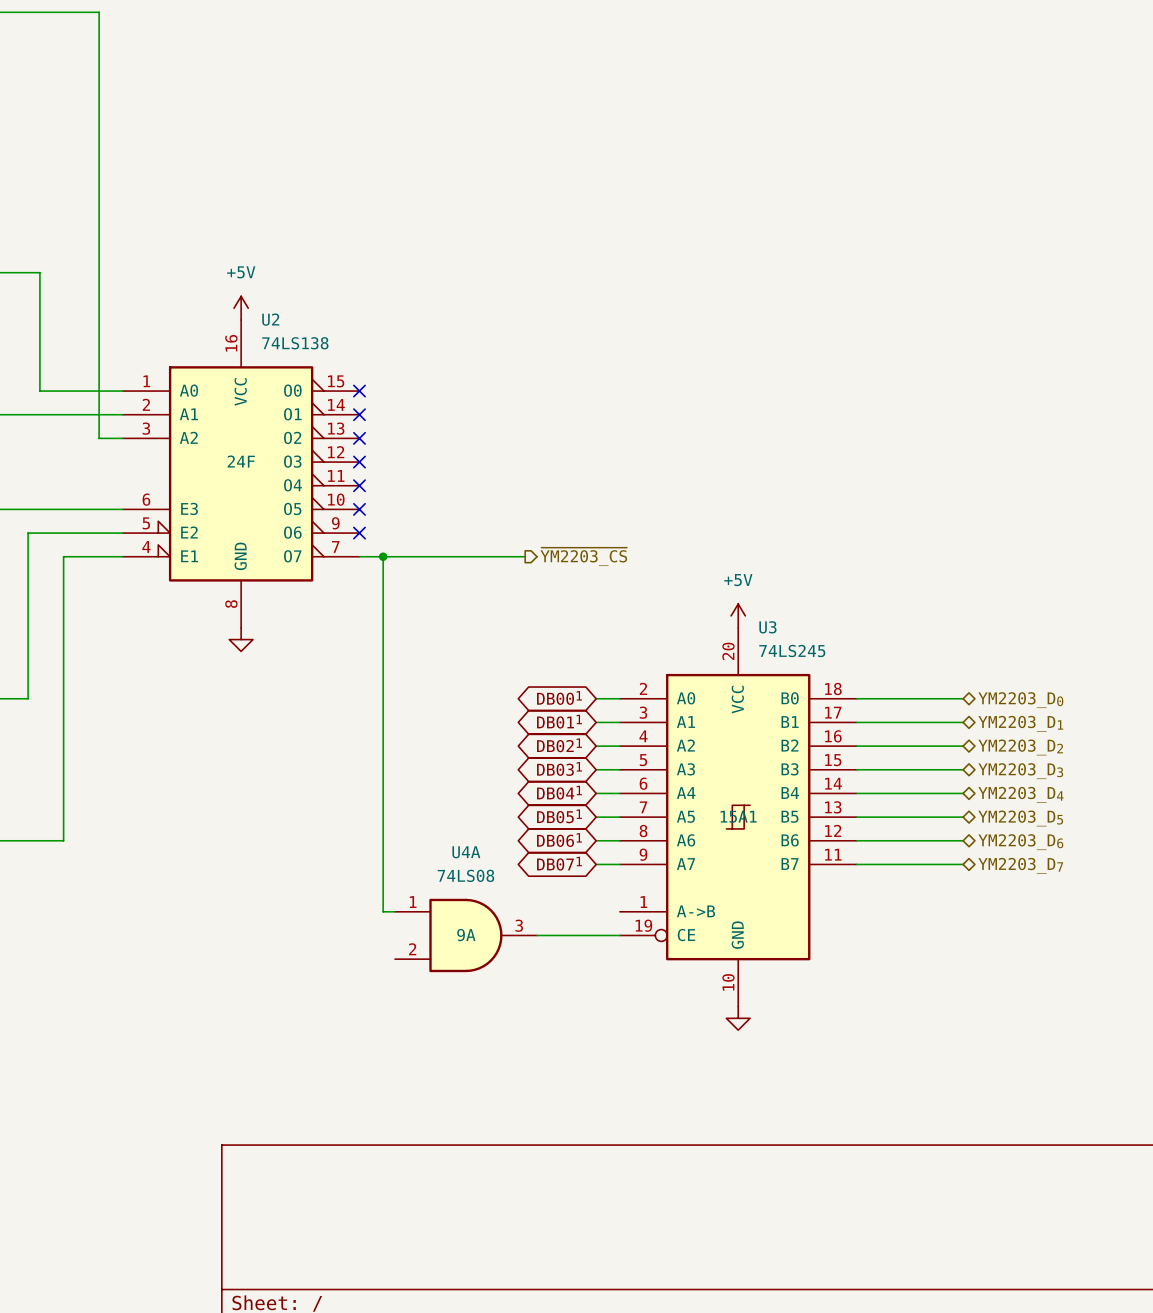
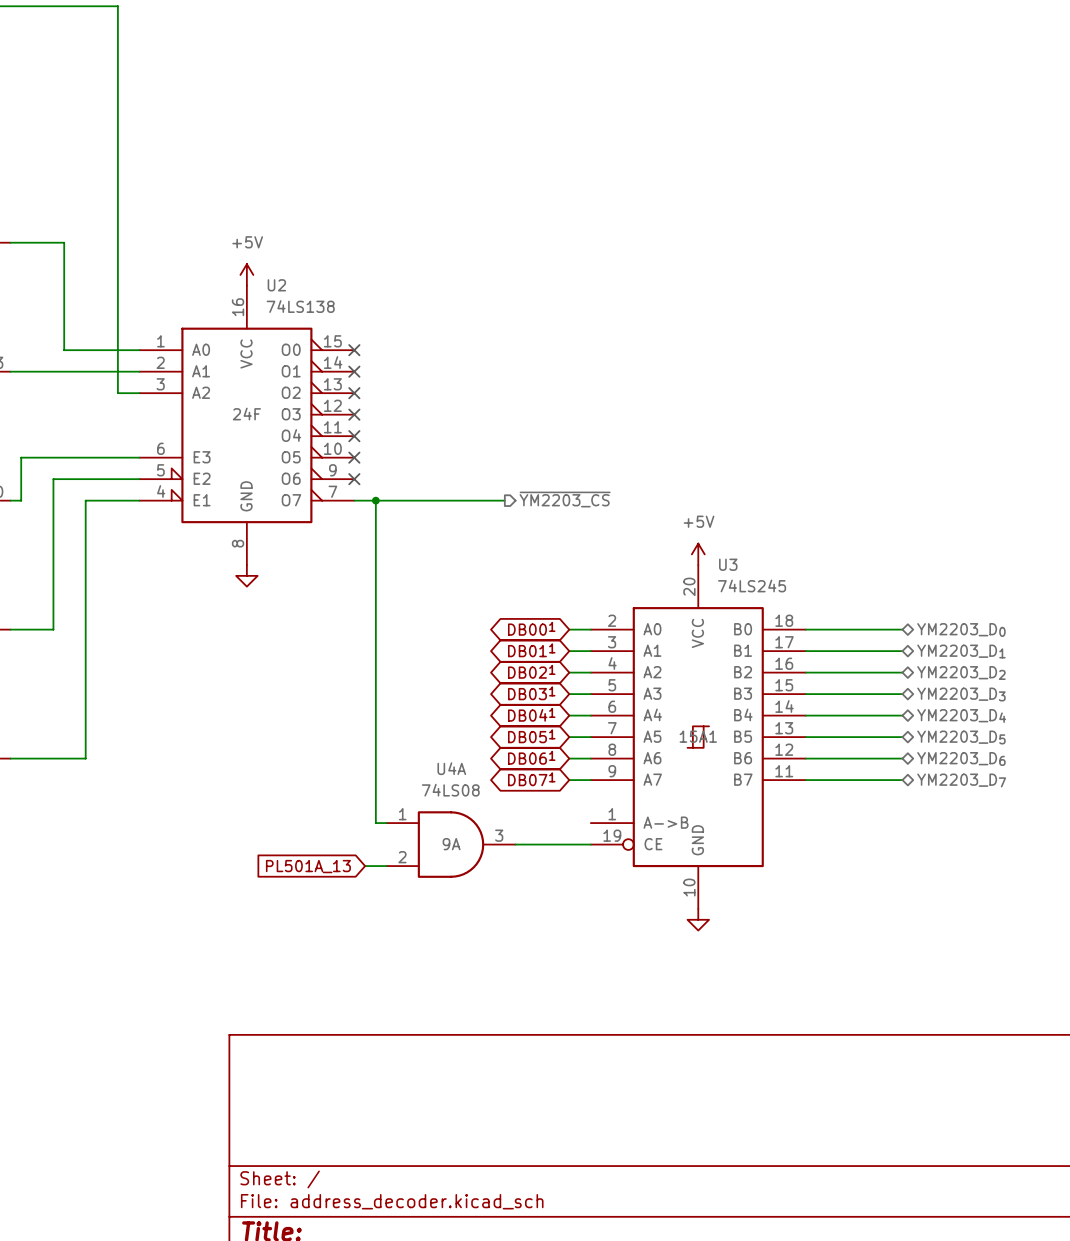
wire: none -> (365, 866) (386, 866)
global label: none -> PL501A_13 (308, 866)

